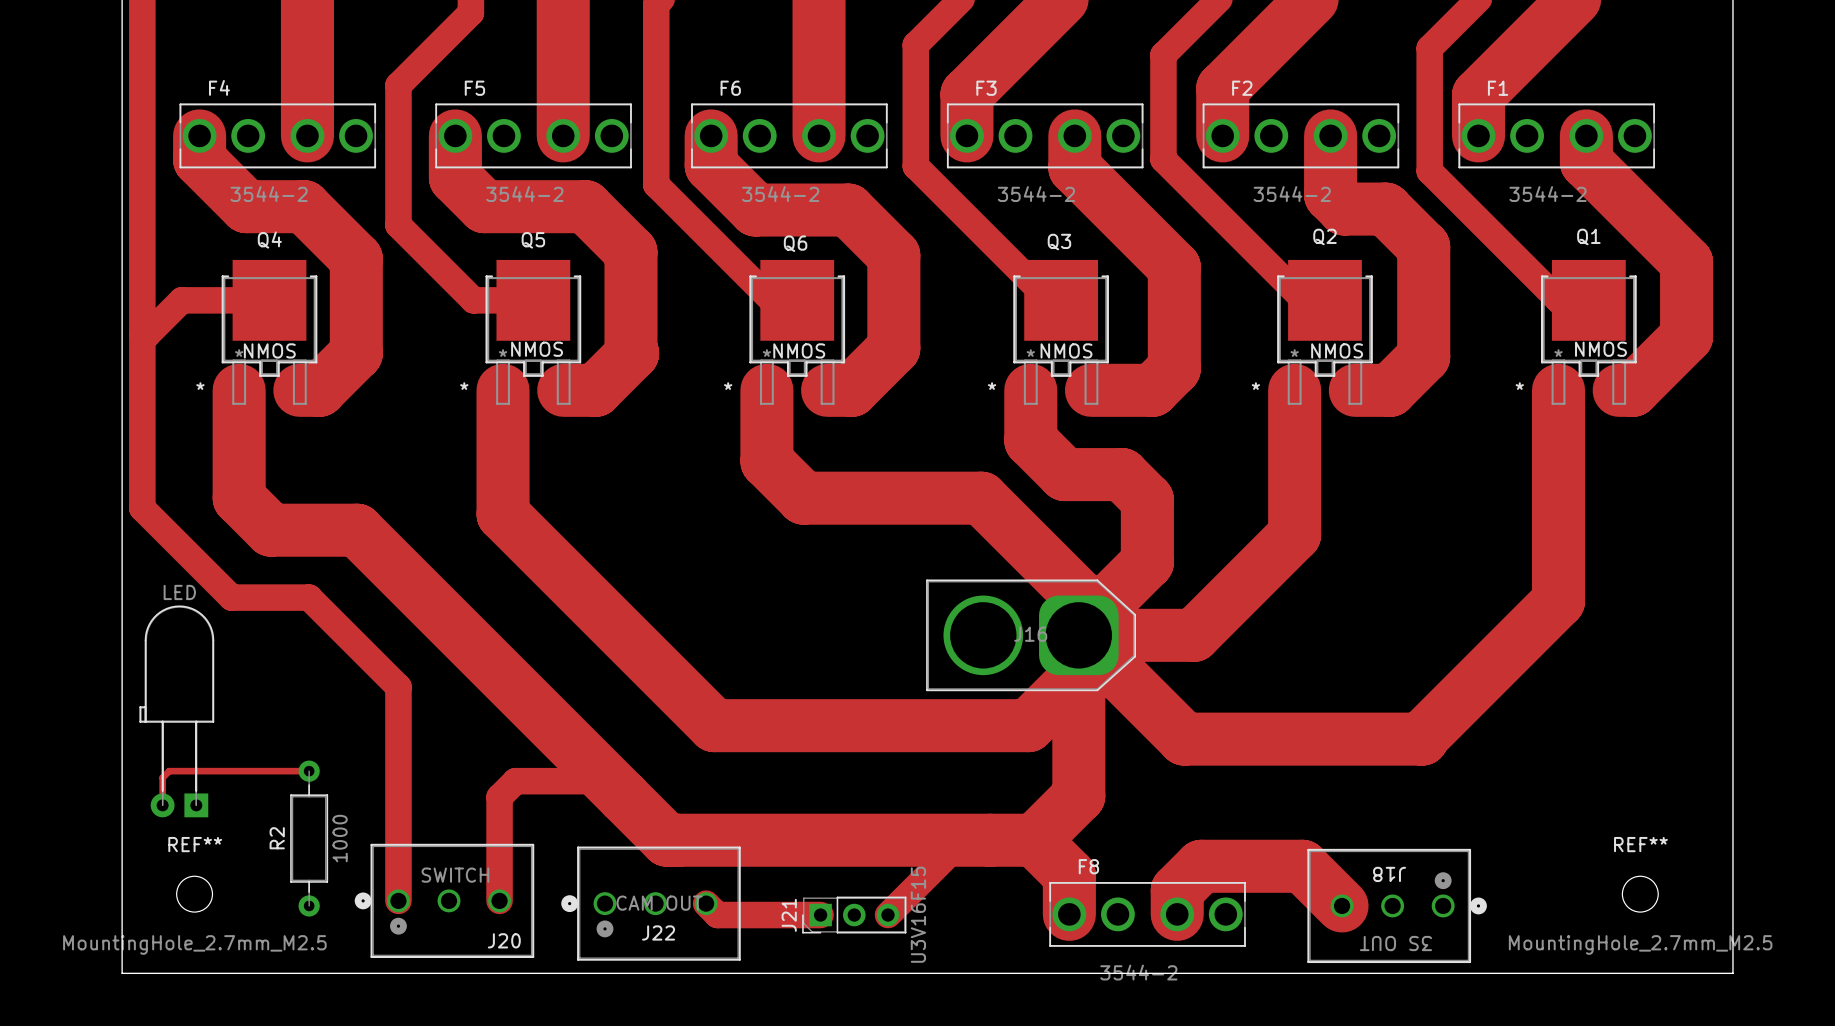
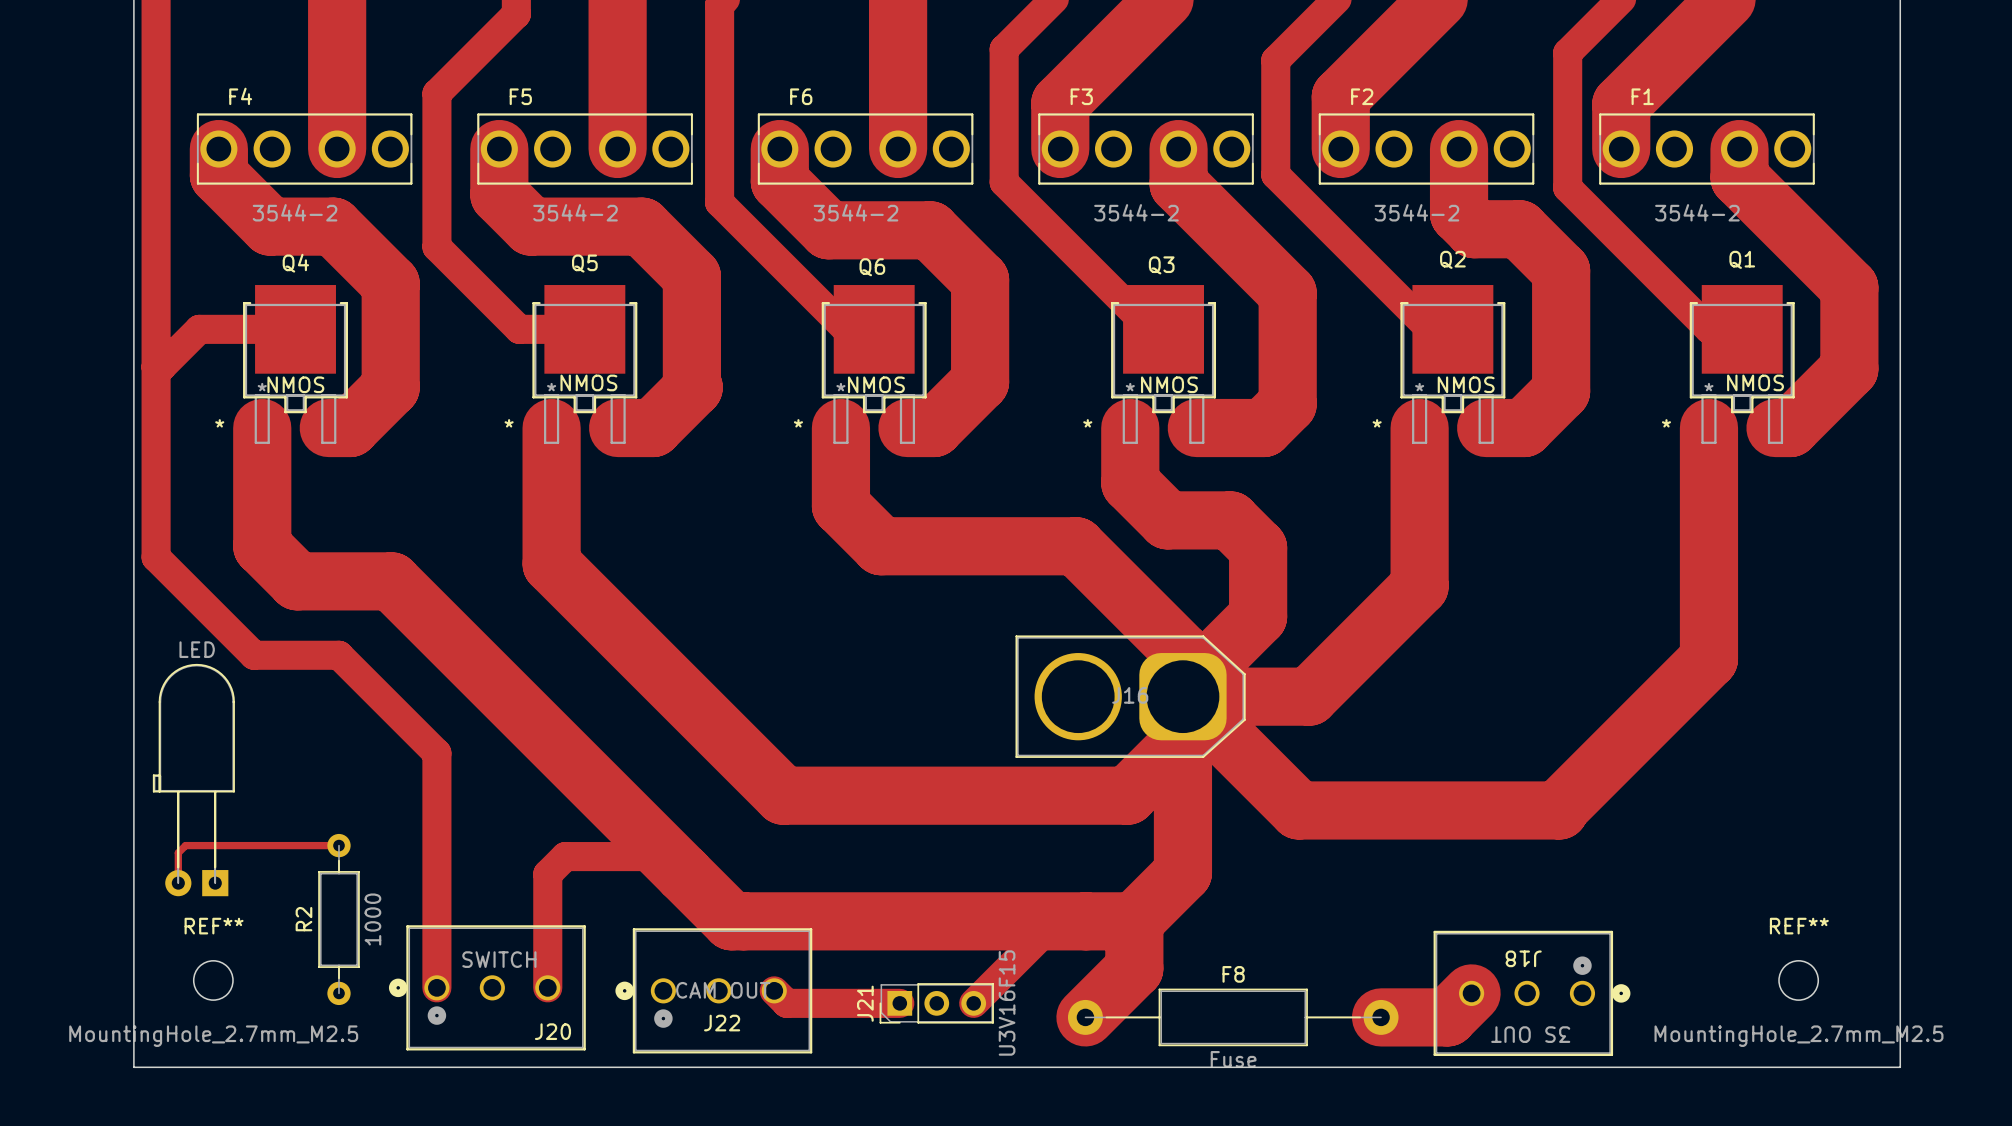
track: (1034, 840) (1069, 875) (1069, 914) -> (1134, 921) (1134, 968) (1085, 1017)
F8 name position: F8 (1088, 866) -> F8 (1233, 974)
F8 footprint: [1049, 882, 1246, 947] -> [1067, 988, 1399, 1047]
track: (1335, 905) (1342, 905) (1302, 866) (1201, 866) (1177, 890) (1177, 914) -> none
track: none -> (1471, 993) (1447, 1017) (1381, 1017)
F8 value: 3544-2 (1138, 972) -> Fuse (1233, 1059)

